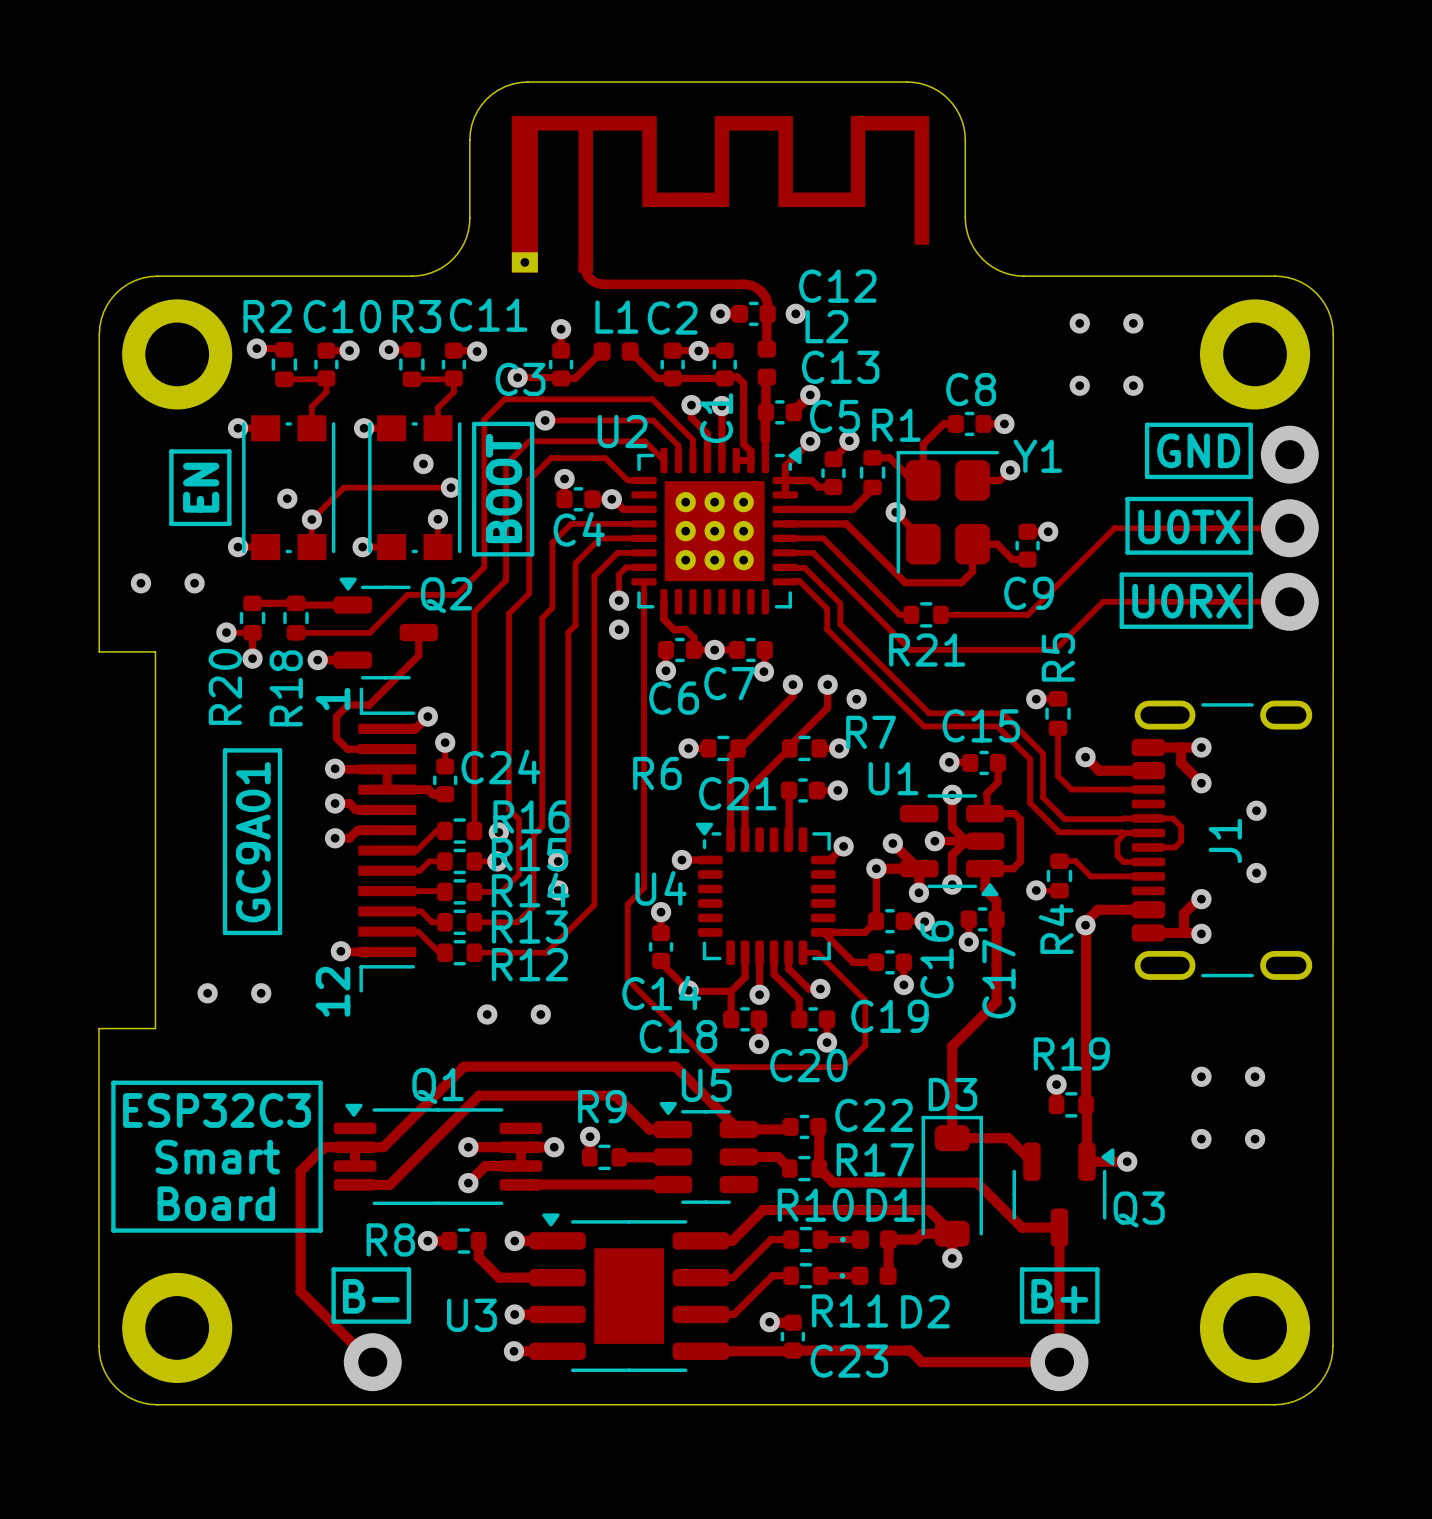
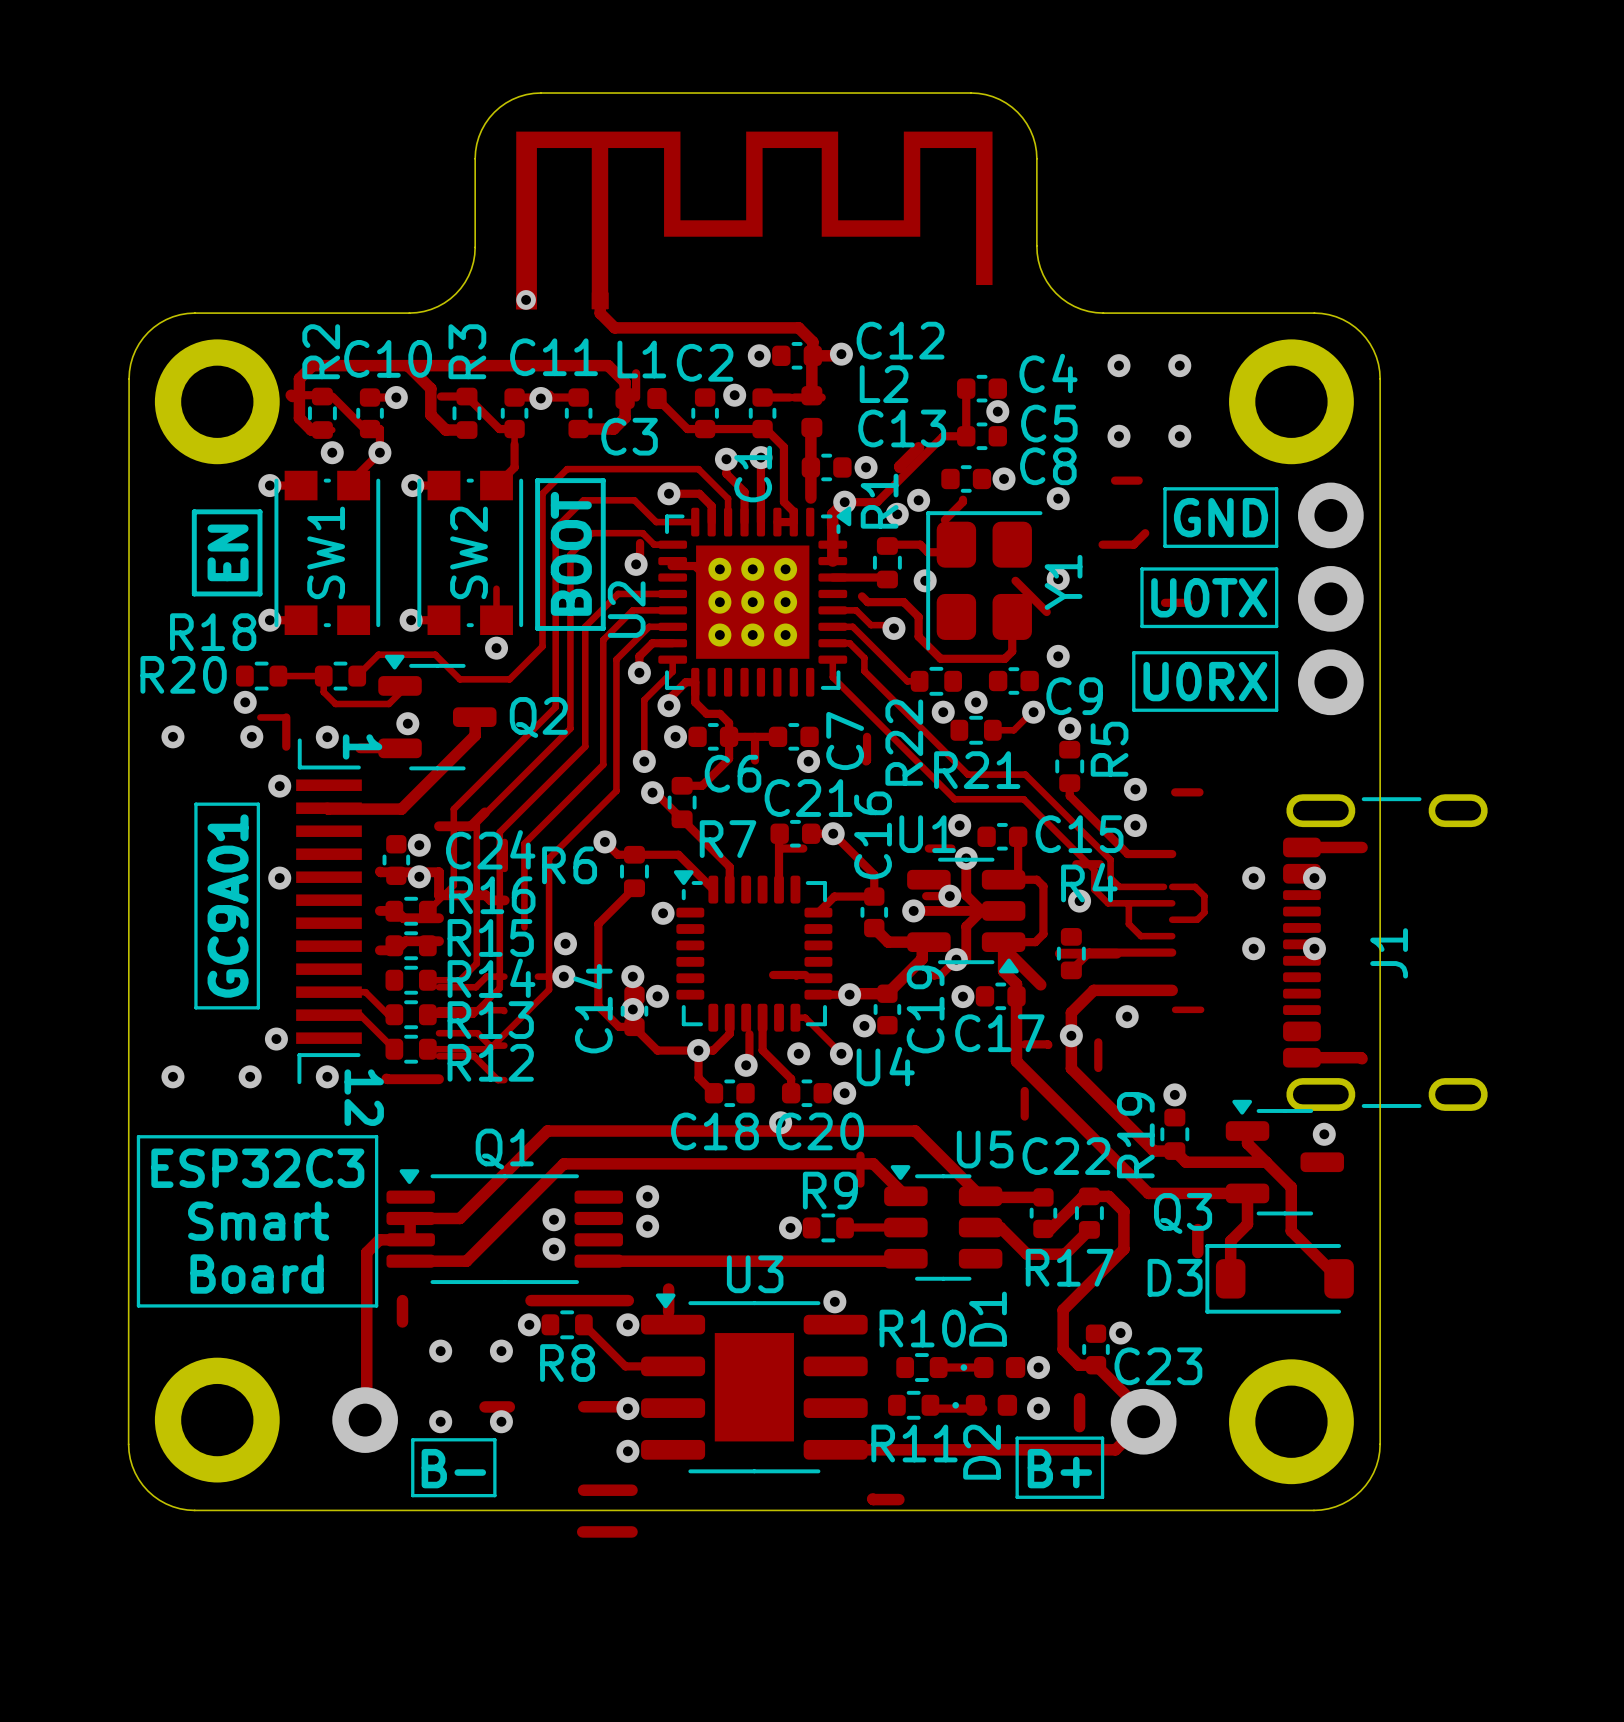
board edge: (527, 82) (505, 86) (492, 94) (481, 104) (474, 117) (469, 139) (469, 224) (466, 237) (457, 254) (442, 267) (424, 274) (361, 276) -> (598, 93) (526, 94) (505, 103) (489, 117) (478, 137) (475, 151) (475, 247) (471, 269) (460, 288) (450, 298) (431, 309) (409, 313)
board edge: (856, 82) (920, 83) (938, 90) (952, 103) (962, 120) (964, 133) (965, 223) (970, 242) (982, 258) (992, 267) (1004, 272) (1023, 276) -> (971, 93) (992, 96) (1012, 107) (1022, 117) (1033, 137) (1036, 158) (1037, 253) (1043, 274) (1051, 287) (1067, 302) (1088, 311) (1160, 313)
part: none -> (754, 220)
part: (720, 194) -> none
via: none -> (526, 299)
track: none -> (600, 300) (600, 313) (614, 327) (798, 327) (812, 342) (811, 395)
track: (585, 265) (588, 276) (600, 284) (743, 284) (753, 286) (762, 292) (767, 301) (766, 349) -> none
board edge: (171, 276) (142, 278) (122, 288) (107, 305) (101, 319) (99, 334) (99, 651) (155, 651) (155, 1028) (99, 1028) (98, 1346) (104, 1371) (116, 1387) (138, 1401) (157, 1404) (1281, 1404) (1299, 1398) (1320, 1382) (1329, 1365) (1332, 1346) (1332, 327) (1327, 308) (1320, 297) (1311, 288) (1294, 279) (1275, 276) (1159, 276) -> (194, 313) (173, 316) (153, 327) (143, 337) (135, 350) (129, 371) (128, 1444) (132, 1466) (138, 1479) (147, 1491) (159, 1500) (172, 1506) (194, 1510) (1313, 1510) (1335, 1506) (1349, 1500) (1360, 1491) (1370, 1479) (1376, 1466) (1380, 1444) (1380, 378) (1376, 357) (1370, 343) (1360, 332) (1349, 323) (1336, 316) (1314, 313)
C12 name position: C12 (837, 286) -> C12 (900, 340)
via: none -> (759, 355)
via position: (720, 313) -> (841, 354)
C12 position: (753, 313) -> (797, 355)
via: (795, 313) -> none
R2 name rotation: 0° (267, 316) -> 90° counterclockwise (321, 351)
R3 name rotation: 0° (416, 316) -> 90° counterclockwise (467, 351)
C2 name: C2 (672, 318) -> C1 (753, 474)
track: none -> (407, 365) (430, 388) (430, 414) (445, 430) (466, 430)
via: none -> (1118, 365)
via: none -> (1179, 365)
via: (1079, 323) -> none
via: (1133, 323) -> none
L2 name position: L2 (826, 326) -> L2 (884, 384)
via: (561, 329) -> none
track: none -> (966, 388) (966, 436) (943, 436) (877, 502) (844, 502) (832, 514) (832, 525)
via: (256, 348) -> none
track: none -> (549, 394) (548, 397) (578, 397)
via: none -> (734, 395)
via: (388, 349) -> none
track: (602, 350) (575, 378) (518, 378) -> none
via: (698, 350) -> none
L1 position: (616, 351) -> (641, 398)
track: (630, 351) (657, 378) -> (656, 398) (687, 429) (745, 429)
part position: (177, 354) -> (217, 401)
part position: (1255, 354) -> (1291, 401)
L2 position: (766, 363) -> (811, 411)
via: none -> (997, 411)
C3 position: (561, 364) -> (578, 413)
C2: none -> (705, 413)
C1: (724, 364) -> none
C13 name position: C13 (840, 367) -> C13 (902, 428)
via: (517, 377) -> none
track: none -> (811, 427) (810, 498)
track: (766, 377) (765, 460) -> none
track: (453, 378) (411, 379) -> (514, 429) (499, 429) (466, 396)
track: none -> (578, 429) (613, 429) (625, 417) (625, 382) (608, 365) (312, 365) (299, 378) (299, 418) (311, 430) (322, 430)
track: (672, 378) (737, 377) (743, 383) (743, 444) (750, 451) (750, 460) (736, 460) -> (762, 429) (764, 427) (783, 447) (783, 459)
track: (293, 379) (326, 378) (326, 392) (311, 406) (311, 422) -> (332, 396) (364, 429) (379, 429) (379, 452) (353, 478)
C3 name position: C3 (520, 379) -> C3 (629, 436)
via: none -> (1118, 436)
via: none -> (1179, 436)
via: (1079, 385) -> none
via: (1133, 385) -> none
C8 name position: C8 (971, 389) -> C8 (1048, 466)
track: (453, 392) (437, 408) (437, 428) -> (514, 444) (514, 467) (496, 485)
via: (810, 394) -> none
via: none -> (332, 452)
via: none -> (379, 452)
track: none -> (760, 457) (760, 522)
track: none -> (726, 459) (726, 473) (744, 491) (744, 522)
via: none -> (726, 459)
via position: (691, 405) -> (760, 457)
track: (721, 406) (721, 460) -> none
via: (721, 406) -> none
via: none -> (866, 467)
C13 position: (779, 412) -> (826, 467)
track: (691, 417) (707, 433) (707, 460) -> (783, 473) (783, 501) (793, 511) (793, 522) (777, 522)
track: (545, 420) (653, 420) (678, 445) (678, 460) -> none
via: (545, 420) -> none
via: none -> (1004, 478)
track: (955, 423) (943, 423) (923, 444) (923, 480) (912, 480) (889, 457) (872, 457) -> none
C8 position: (969, 423) -> (966, 478)
via: (1004, 423) -> none
line: (1147, 424) (1250, 424) (1250, 476) (1147, 476) (1147, 424) -> none
R1 name rotation: 0° (896, 425) -> 90° counterclockwise (879, 501)
U2 name rotation: 0° (622, 431) -> 90° counterclockwise (626, 609)
U2 name position: U2 (622, 431) -> U2 (626, 609)
line: none -> (1164, 488) (1276, 488) (1276, 546) (1164, 546) (1164, 488)
track: none -> (668, 493) (699, 493) (711, 506) (711, 522)
via: none -> (668, 493)
via: none -> (1058, 498)
via: (849, 440) -> none
track: (529, 441) (506, 464) (506, 580) (474, 611) (474, 831) -> (599, 500) (583, 500) (555, 528) (555, 707) (453, 809) (453, 885) (427, 911)
track: (559, 441) (644, 441) (663, 460) -> (634, 500) (656, 522) (695, 522)
track: (810, 441) (785, 466) (785, 494) -> none
via: none -> (844, 502)
text position: GND (1198, 450) -> GND (1221, 517)
via: none -> (897, 514)
via: none -> (1330, 515)
via: (1289, 454) -> none
Y1 name rotation: 0° (1037, 456) -> 90° counterclockwise (1063, 582)
track: none -> (728, 522) (728, 498) (698, 469) (567, 469) (542, 493) (542, 646) (509, 679) (459, 679) (435, 654) (378, 654) (357, 676)
track: (692, 460) (692, 439) (652, 399) (504, 399) (484, 419) (484, 567) (456, 594) (407, 594) (369, 632) (295, 632) -> none
via: (423, 463) -> none
track: none -> (832, 525) (832, 561)
via: (1010, 470) -> none
R1 position: (872, 472) -> (887, 562)
C5 rotation: 0° (833, 473) -> 90° clockwise (982, 436)
C5 position: (833, 473) -> (982, 436)
via position: (564, 478) -> (636, 564)
track: none -> (672, 544) (654, 544) (642, 533) (591, 533) (570, 554) (570, 728) (476, 822) (476, 963) (460, 980) (427, 980)
track: (644, 480) (627, 480) (605, 458) (550, 458) (529, 479) (529, 593) (508, 613) (508, 809) (519, 819) (519, 874) (501, 891) (474, 891) -> none
SW1 name: none -> SW1 (326, 552)
SW2 name: none -> SW2 (469, 552)
track: (451, 487) (343, 487) (311, 519) (311, 547) -> none
via: (451, 487) -> none
track: (868, 493) (852, 509) (785, 509) -> none
via: (287, 498) -> none
line: (1127, 498) (1250, 498) (1250, 552) (1127, 552) (1127, 498) -> none
C4 position: (578, 499) -> (982, 388)
via: (611, 499) -> none
line: none -> (1141, 568) (1276, 568) (1276, 626) (1141, 626) (1141, 568)
track: none -> (832, 577) (885, 577) (887, 579) (880, 579)
via: none -> (925, 580)
via position: (895, 512) -> (1058, 579)
Y1 position: (947, 512) -> (984, 580)
via: (311, 519) -> none
via: (437, 519) -> none
track: (571, 523) (552, 542) (552, 607) (542, 618) (542, 826) (533, 835) (533, 906) (517, 922) (474, 922) -> (647, 593) (618, 593) (585, 626) (585, 746) (499, 832) (499, 988) (473, 1014) (427, 1014)
track: (593, 523) (644, 523) -> none
track: (785, 523) (846, 523) (905, 582) (961, 582) (972, 571) (972, 544) (997, 544) (1012, 559) (1027, 559) -> none
track: none -> (862, 596) (867, 602) (903, 602) (918, 616) (918, 636) (940, 658) (1004, 658) (1012, 651) (1012, 616)
text position: U0TX (1189, 526) -> U0TX (1209, 597)
via: none -> (1330, 598)
track: (1260, 528) (1114, 528) (1027, 614) (940, 614) -> none
via: (1289, 528) -> none
C4 name position: C4 (579, 529) -> C4 (1048, 373)
U2 position: (716, 530) -> (754, 601)
via: (1048, 531) -> none
track: none -> (672, 610) (632, 610) (603, 639) (603, 764) (524, 843) (524, 927)
track: (644, 538) (600, 538) (575, 563) (575, 625) (568, 632) -> (672, 659) (672, 671) (644, 700) (644, 717)
track: none -> (832, 610) (856, 610) (870, 625) (890, 625) (893, 628)
track: (785, 538) (823, 538) (899, 614) (911, 614) -> none
C9 rotation: 0° (1027, 545) -> 90° clockwise (1013, 681)
C9 position: (1027, 545) -> (1013, 681)
track: none -> (672, 626) (649, 626) (616, 659) (616, 791) (549, 858) (549, 989) (489, 1049) (427, 1049)
track: (644, 552) (617, 552) (594, 576) (594, 904) (546, 952) (474, 952) -> none
track: none -> (832, 626) (852, 626) (907, 681) (919, 681)
track: (785, 552) (813, 552) (910, 649) (1055, 649) (1103, 601) (1260, 601) -> none
via: none -> (893, 628)
track: none -> (672, 643) (652, 643) (639, 656) (639, 672)
track: (644, 567) (626, 567) (619, 574) (619, 600) -> none
track: none -> (832, 643) (849, 643) (864, 658) (864, 671) (967, 774) (1025, 774) (1110, 859) (1110, 878) (1119, 886) (1163, 886)
track: (785, 567) (804, 568) (840, 603) (840, 624) (929, 713) (1002, 713) (1043, 753) (1043, 797) (1064, 819) (1172, 818) (1181, 826) (1181, 841) (1174, 847) (1148, 847) -> none
via: none -> (496, 648)
line: (1121, 574) (1250, 574) (1250, 626) (1121, 626) (1121, 574) -> none
line: none -> (1133, 652) (1276, 652) (1276, 710) (1133, 710) (1133, 652)
via: none -> (1058, 656)
track: (644, 581) (644, 888) (627, 904) (627, 979) (715, 1067) (843, 1067) (865, 1045) (865, 1000) (817, 952) (803, 952) -> none
track: none -> (832, 659) (832, 677) (954, 799) (1023, 799) (1094, 869) (1094, 889) (1108, 903) (1172, 903)
track: (785, 581) (799, 581) (827, 608) (827, 629) (923, 726) (997, 726) (1030, 759) (1030, 803) (1059, 832) (1148, 833) -> none
via: (140, 583) -> none
via: (194, 583) -> none
via: none -> (639, 672)
C9 name position: C9 (1029, 593) -> C9 (1074, 696)
Q2 name position: Q2 (446, 595) -> Q2 (538, 717)
track: none -> (278, 676) (323, 676) (323, 692) (335, 703) (388, 703) (407, 685)
via: (619, 600) -> none
R22: none -> (936, 681)
track: (663, 601) (663, 619) (674, 629) (685, 629) (693, 637) (693, 649) (736, 649) -> none
via: none -> (1330, 682)
text position: U0RX (1186, 601) -> U0RX (1205, 681)
via: (1289, 601) -> none
track: (252, 603) (295, 603) -> (729, 736) (778, 736)
track: (297, 605) (352, 605) -> none
R21 position: (926, 614) -> (976, 730)
R20 rotation: 0° (252, 618) -> 90° clockwise (261, 676)
R20 position: (252, 618) -> (261, 676)
R18 rotation: 0° (295, 618) -> 90° clockwise (340, 676)
via: none -> (245, 702)
via: none -> (976, 702)
via: none -> (668, 705)
track: none -> (670, 707) (668, 699) (685, 682) (695, 682) (695, 702) (706, 713) (719, 713) (729, 723) (729, 758) (702, 785) (682, 785)
via: none -> (943, 712)
track: none -> (1033, 712) (1013, 730) (992, 730)
via: none -> (1033, 712)
via: (619, 629) -> none
via: (226, 632) -> none
track: (418, 632) (418, 655) (369, 704) (348, 704) (336, 716) (336, 738) (347, 749) (387, 749) -> (475, 717) (475, 735) (401, 809) (327, 808)
via: none -> (407, 723)
via: none -> (1069, 728)
via: none -> (172, 736)
via: none -> (251, 736)
via: none -> (675, 736)
C6 position: (679, 649) -> (713, 736)
via position: (714, 649) -> (808, 761)
C7 position: (750, 649) -> (793, 736)
via: none -> (327, 737)
R5 name position: R5 (1058, 657) -> R5 (1109, 749)
via: (252, 658) -> none
via: (317, 660) -> none
via: (665, 670) -> none
track: (568, 671) (568, 851) (558, 861) -> none
via: none -> (644, 761)
via: (763, 671) -> none
C7 name rotation: 0° (729, 683) -> 90° counterclockwise (845, 740)
track: (792, 684) (792, 696) (740, 748) (738, 748) (730, 755) (730, 839) -> none
via: (792, 684) -> none
track: (827, 684) (827, 707) (745, 793) (745, 839) -> none
via: (827, 684) -> none
track: none -> (1069, 783) (1069, 795) (1127, 854) (1172, 854)
via: none -> (279, 786)
via: none -> (1135, 789)
text rotation: 0° (333, 698) -> 180° (362, 746)
C6 name position: C6 (674, 698) -> C6 (733, 773)
track: none -> (652, 792) (655, 792) (729, 866) (729, 889)
via: none -> (652, 792)
via: (856, 699) -> none
via: (1036, 699) -> none
line: none -> (195, 804) (258, 804) (258, 1007) (195, 1007) (195, 804)
R5 position: (1058, 713) -> (1069, 766)
via: (427, 716) -> none
C15 name position: C15 (981, 725) -> C15 (1079, 834)
via: none -> (959, 825)
via: none -> (1135, 825)
track: (1058, 728) (1058, 775) (1071, 789) (1148, 789) -> none
track: none -> (779, 833) (779, 889)
track: none -> (811, 833) (833, 833) (874, 874) (874, 896) (834, 896) (818, 912)
via: none -> (833, 833)
track: none -> (1018, 836) (1018, 871)
via: (445, 742) -> none
track: none -> (604, 841) (617, 854) (678, 854) (713, 889)
via: none -> (604, 841)
via: none -> (419, 845)
track: (1181, 747) (1181, 762) (1201, 783) -> none
via: (1201, 747) -> none
via: (688, 748) -> none
R6 rotation: 0° (723, 748) -> 90° clockwise (634, 871)
R6 position: (723, 748) -> (634, 871)
R7 rotation: 0° (804, 748) -> 90° clockwise (682, 802)
R7 position: (804, 748) -> (682, 802)
via: (839, 748) -> none
line: (225, 750) (280, 750) (280, 932) (225, 932) (225, 750) -> none
via: none -> (966, 858)
track: (1085, 757) (1099, 770) (1148, 770) -> none
via position: (1085, 757) -> (1253, 878)
via: (949, 762) -> none
C15 position: (984, 762) -> (1002, 836)
track: (998, 762) (998, 782) (987, 793) (987, 811) (985, 813) -> none
C24 name position: C24 (500, 766) -> C24 (490, 849)
via: (335, 768) -> none
via: none -> (419, 876)
via: none -> (279, 878)
via: none -> (1314, 878)
U1 name position: U1 (893, 778) -> U1 (927, 834)
C24 position: (445, 780) -> (396, 860)
track: none -> (1172, 886) (1195, 886) (1204, 896) (1204, 912) (1197, 919) (1172, 919)
track: none -> (634, 888) (598, 924) (598, 1006) (619, 1026) (634, 1026)
via: (1201, 783) -> none
track: (789, 790) (788, 839) -> none
C21 position: (803, 790) -> (795, 833)
C21 name position: C21 (737, 793) -> C21 (808, 798)
track: (952, 794) (952, 827) (966, 841) (952, 854) (952, 884) -> (966, 858) (966, 895) (981, 910) (966, 926) (966, 960)
track: none -> (1128, 903) (1128, 924) (1140, 936) (1172, 936)
via: (335, 803) -> none
track: none -> (913, 910) (1003, 910)
via: none -> (913, 910)
via: none -> (663, 913)
via: (1256, 810) -> none
track: (991, 813) (1014, 813) (1020, 819) (1020, 861) (1013, 868) (991, 868) -> (1010, 879) (1036, 879) (1043, 886) (1043, 934) (1035, 942) (1010, 942)
track: none -> (874, 928) (888, 942) (922, 942) (922, 958) (887, 993) (818, 994)
track: (444, 831) (436, 831) (417, 850) (387, 850) -> none
R16 position: (459, 831) -> (411, 911)
track: none -> (1003, 942) (1003, 971) (1016, 984) (1016, 1061) (1148, 1193) (1247, 1193) (1247, 1224) (1230, 1241) (1230, 1278) (1229, 1277)
track: (1125, 833) (1117, 841) (1117, 855) (1123, 861) (1148, 861) -> none
via: none -> (1253, 948)
via: none -> (1314, 948)
via: (335, 838) -> none
part position: (387, 840) -> (328, 911)
track: none -> (1172, 952) (1089, 952) (1071, 970)
via: (934, 841) -> none
text position: GC9A01 (253, 842) -> GC9A01 (228, 906)
via: (892, 843) -> none
U1 position: (952, 845) -> (966, 915)
via: (681, 860) -> none
R15 position: (459, 861) -> (411, 945)
track: (1059, 861) (1075, 861) (1090, 876) (1148, 876) -> none
via: (876, 868) -> none
track: (985, 868) (985, 889) (996, 900) (996, 1002) (952, 1046) (952, 1138) (1008, 1138) (1031, 1161) -> none
track: none -> (1172, 990) (1093, 990) (1071, 1012) (1071, 1068) (1153, 1151) (1174, 1151) (1186, 1162) (1266, 1162)
via: (1256, 873) -> none
R4 position: (1059, 875) -> (1071, 953)
track: none -> (327, 993) (365, 992) (388, 1014) (394, 1014)
via: none -> (849, 994)
via: none -> (657, 996)
via: none -> (962, 996)
via: (952, 884) -> none
U4 name position: U4 (661, 888) -> U4 (885, 1066)
via: (1036, 890) -> none
R14 position: (459, 891) -> (411, 980)
via: (918, 892) -> none
track: (919, 892) (919, 868) (876, 868) (876, 920) (864, 932) (823, 932) (853, 962) (876, 962) -> none
U4 position: (765, 893) -> (753, 950)
track: none -> (327, 1015) (360, 1015) (394, 1049)
via: none -> (1127, 1016)
track: none -> (729, 1017) (729, 1033) (713, 1050) (657, 1050) (634, 1027)
track: none -> (762, 1017) (762, 1050) (791, 1078) (791, 1093)
track: none -> (795, 1017) (805, 1017) (841, 1053)
track: (1198, 899) (1184, 913) (1184, 932) -> none
via: (1201, 899) -> none
via: none -> (864, 1025)
track: (1148, 909) (1098, 909) (1085, 922) (1086, 1104) -> none
via: (661, 912) -> none
via: none -> (276, 1039)
C17 position: (982, 919) -> (1000, 996)
C16 rotation: 0° (889, 921) -> 90° clockwise (874, 912)
C16 position: (889, 921) -> (874, 912)
via position: (924, 921) -> (1071, 1035)
R13 position: (459, 922) -> (411, 1014)
via: (1085, 925) -> none
track: none -> (698, 1050) (698, 1077) (714, 1092)
via: none -> (698, 1050)
via: none -> (798, 1053)
via: none -> (841, 1053)
R4 name rotation: 0° (1056, 929) -> 90° clockwise (1089, 882)
R4 name position: R4 (1056, 929) -> R4 (1089, 882)
via: (1201, 933) -> none
via: none -> (746, 1065)
via: (968, 942) -> none
C14 position: (661, 946) -> (634, 1011)
via: none -> (172, 1076)
via: none -> (250, 1076)
via: none -> (327, 1076)
via: (340, 951) -> none
R12 position: (459, 952) -> (411, 1049)
track: (745, 952) (745, 977) (731, 991) -> none
track: (759, 952) (759, 994) -> none
track: (774, 952) (774, 974) (799, 999) (799, 1019) -> none
track: (788, 952) (788, 968) (808, 988) (820, 988) -> none
C16 name position: C16 (936, 959) -> C16 (873, 835)
track: (661, 960) (689, 991) (731, 991) -> none
C19 rotation: 0° (889, 962) -> 90° clockwise (887, 1009)
C19 position: (889, 962) -> (887, 1009)
via: none -> (844, 1093)
via: none -> (1174, 1094)
C17 name rotation: 0° (998, 979) -> 90° clockwise (999, 1033)
via: (903, 984) -> none
via: (820, 988) -> none
text rotation: 0° (333, 991) -> 180° (364, 1097)
track: (731, 991) (731, 1019) -> none
C14 name rotation: 0° (661, 992) -> 90° counterclockwise (593, 1008)
via: (207, 993) -> none
via: (261, 993) -> none
via: (759, 994) -> none
track: none -> (1247, 1131) (1247, 1143) (1291, 1187) (1291, 1231) (1339, 1278)
via: none -> (1324, 1134)
line: none -> (138, 1136) (376, 1136) (376, 1305) (138, 1305) (138, 1136)
via: (487, 1014) -> none
via: (540, 1014) -> none
C19 name position: C19 (889, 1016) -> C19 (925, 1009)
C18 position: (745, 1019) -> (729, 1093)
C20 position: (813, 1019) -> (806, 1093)
C18 name position: C18 (678, 1036) -> C18 (714, 1131)
via: (827, 1042) -> none
via: (759, 1044) -> none
R19 name position: R19 (1071, 1053) -> R19 (1135, 1135)
via: none -> (647, 1196)
track: none -> (905, 1196) (873, 1163) (563, 1163) (466, 1261) (410, 1261)
track: none -> (1042, 1196) (1043, 1197) (981, 1197) (915, 1131) (547, 1131) (459, 1218) (410, 1218) (410, 1239) (379, 1239) (366, 1252) (366, 1418) (365, 1420)
C20 name position: C20 (808, 1065) -> C20 (820, 1131)
via: none -> (554, 1219)
via: (1201, 1076) -> none
via: (1255, 1076) -> none
via: none -> (647, 1226)
line: (113, 1082) (320, 1082) (320, 1230) (113, 1230) (113, 1082) -> none
track: none -> (980, 1227) (1000, 1227) (1027, 1254) (1065, 1254) (1089, 1229)
track: none -> (1042, 1227) (1050, 1228) (1083, 1196) (1108, 1196) (1123, 1211) (1123, 1249) (1063, 1310) (1063, 1349) (1078, 1365) (1096, 1365) (1143, 1412) (1143, 1421) (1115, 1449) (835, 1449)
via: none -> (790, 1227)
via: (1056, 1084) -> none
U5 name position: U5 (706, 1085) -> U5 (985, 1149)
via: none -> (554, 1249)
R19 rotation: 0° (1071, 1104) -> 90° clockwise (1174, 1134)
R19 position: (1071, 1104) -> (1174, 1134)
track: (1086, 1105) (1086, 1161) (1127, 1161) -> none
R9 name position: R9 (602, 1106) -> R9 (830, 1190)
text position: ESP32C3 (216, 1110) -> ESP32C3 (257, 1168)
track: none -> (905, 1258) (903, 1261) (599, 1261)
C22 name position: C22 (874, 1115) -> C22 (1066, 1156)
track: (790, 1126) (788, 1129) (738, 1129) (675, 1066) (464, 1066) (383, 1147) (377, 1147) -> none
C22 rotation: 0° (804, 1126) -> 90° clockwise (1043, 1213)
C22 position: (804, 1126) -> (1043, 1213)
track: (818, 1126) (819, 1168) (833, 1182) (976, 1182) (1021, 1227) (1059, 1227) (1059, 1362) (921, 1362) (910, 1350) (700, 1351) -> none
track: (673, 1129) (649, 1129) (615, 1095) (479, 1095) (389, 1184) (355, 1184) -> none
via: (590, 1136) -> none
via: (1201, 1139) -> none
via: (1255, 1139) -> none
track: (348, 1147) (324, 1147) (300, 1171) (300, 1291) (372, 1362) -> none
via: (468, 1147) -> none
track: (520, 1147) (520, 1166) (485, 1166) (468, 1183) -> none
via position: (554, 1147) -> (627, 1324)
via: none -> (834, 1301)
U5 position: (705, 1152) -> (943, 1222)
Q1 position: (437, 1154) -> (504, 1226)
text position: Smart (217, 1157) -> Smart (258, 1221)
R9 position: (604, 1157) -> (828, 1227)
track: (619, 1157) (672, 1157) -> (845, 1227) (905, 1227)
track: (738, 1157) (778, 1157) (789, 1168) -> none
via: (1127, 1161) -> none
track: none -> (583, 1324) (625, 1366) (673, 1366)
R17 rotation: 0° (804, 1168) -> 90° clockwise (1089, 1213)
R17 position: (804, 1168) -> (1089, 1213)
via: none -> (1120, 1333)
D3 rotation: 0° (952, 1181) -> 90° counterclockwise (1279, 1278)
D3 position: (952, 1181) -> (1279, 1278)
via position: (468, 1183) -> (529, 1324)
track: (521, 1184) (673, 1184) -> none
via: none -> (440, 1351)
via: none -> (501, 1351)
Q3 rotation: 0° (1063, 1194) -> 90° counterclockwise (1284, 1157)
Q3 position: (1063, 1194) -> (1284, 1157)
text position: Board (216, 1203) -> Board (257, 1274)
R10 name: R10 (815, 1205) -> R11 (914, 1443)
D1 name: D1 (890, 1205) -> D2 (982, 1452)
R10: none -> (921, 1367)
D1: none -> (992, 1367)
via: none -> (1038, 1367)
Q3 name position: Q3 (1139, 1209) -> Q3 (1183, 1213)
track: (952, 1233) (921, 1233) (916, 1239) (888, 1239) (888, 1275) -> none
track: (952, 1233) (928, 1210) (763, 1210) (732, 1240) (700, 1240) -> none
R8 name position: R8 (390, 1239) -> R8 (567, 1363)
track: (791, 1239) (771, 1239) (733, 1277) (700, 1277) -> none
track: (820, 1239) (860, 1239) -> (938, 1367) (983, 1367)
via position: (427, 1241) -> (501, 1421)
R8 position: (464, 1241) -> (567, 1324)
track: (478, 1241) (478, 1257) (499, 1277) (557, 1277) -> none
via: (514, 1241) -> none
via: none -> (627, 1408)
via: none -> (1038, 1408)
via: none -> (440, 1421)
via: (952, 1258) -> none
line: (333, 1269) (408, 1269) (408, 1321) (333, 1321) (333, 1269) -> none
line: (1022, 1269) (1097, 1269) (1097, 1321) (1022, 1321) (1022, 1269) -> (1017, 1438) (1102, 1438) (1102, 1497) (1017, 1497) (1017, 1438)
line: none -> (412, 1439) (494, 1439) (494, 1495) (412, 1495) (412, 1439)
track: (791, 1275) (772, 1275) (733, 1314) (700, 1314) -> none
R11: (805, 1275) -> none
track: (820, 1275) (859, 1275) -> (938, 1408) (983, 1408)
D2: (868, 1275) -> none
via: none -> (627, 1451)
U3 position: (629, 1292) -> (754, 1383)
text position: B- (371, 1296) -> B- (453, 1468)
text position: B+ (1059, 1296) -> B+ (1059, 1468)
via: (514, 1314) -> none
U3 name position: U3 (471, 1315) -> U3 (755, 1274)
via: (769, 1322) -> none
part position: (177, 1327) -> (217, 1420)
part position: (1255, 1327) -> (1291, 1421)
C23 position: (792, 1336) -> (1096, 1349)
via: (513, 1351) -> none
C23 name position: C23 (849, 1361) -> C23 (1158, 1366)
via position: (372, 1362) -> (365, 1420)
via position: (1059, 1362) -> (1143, 1421)

